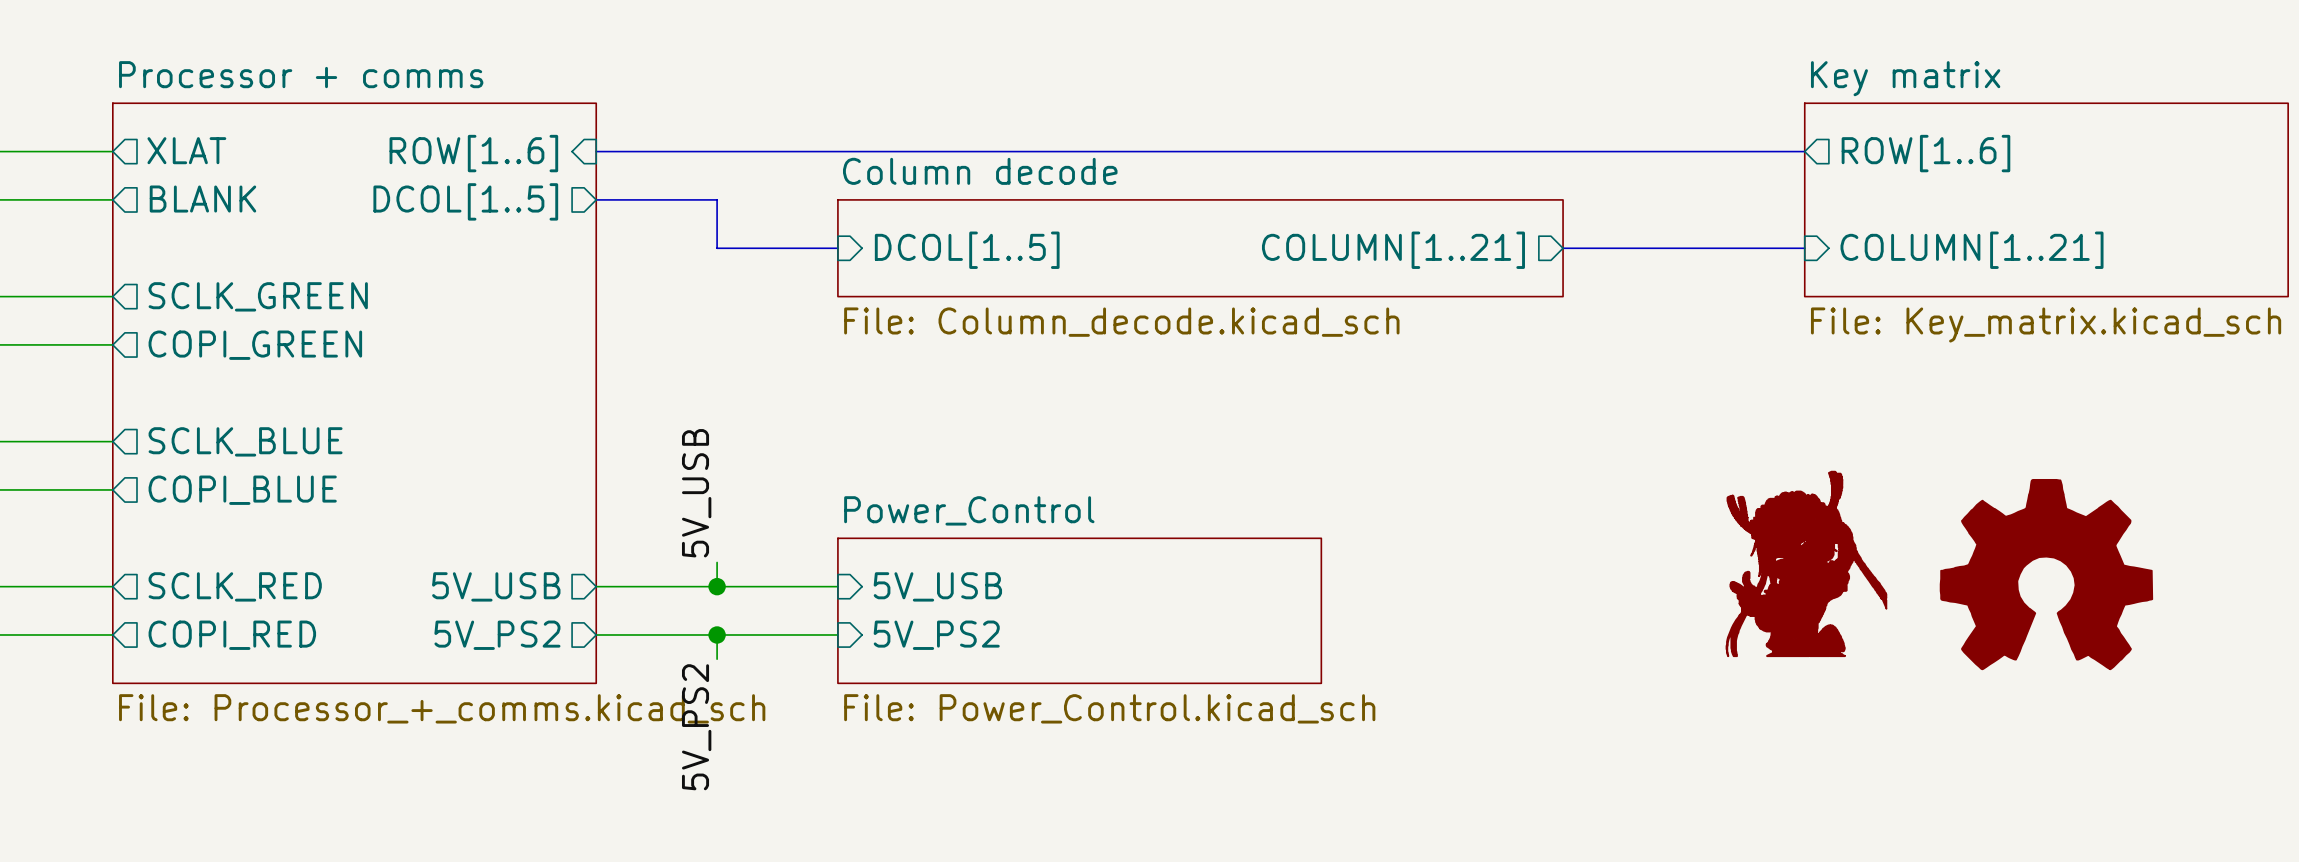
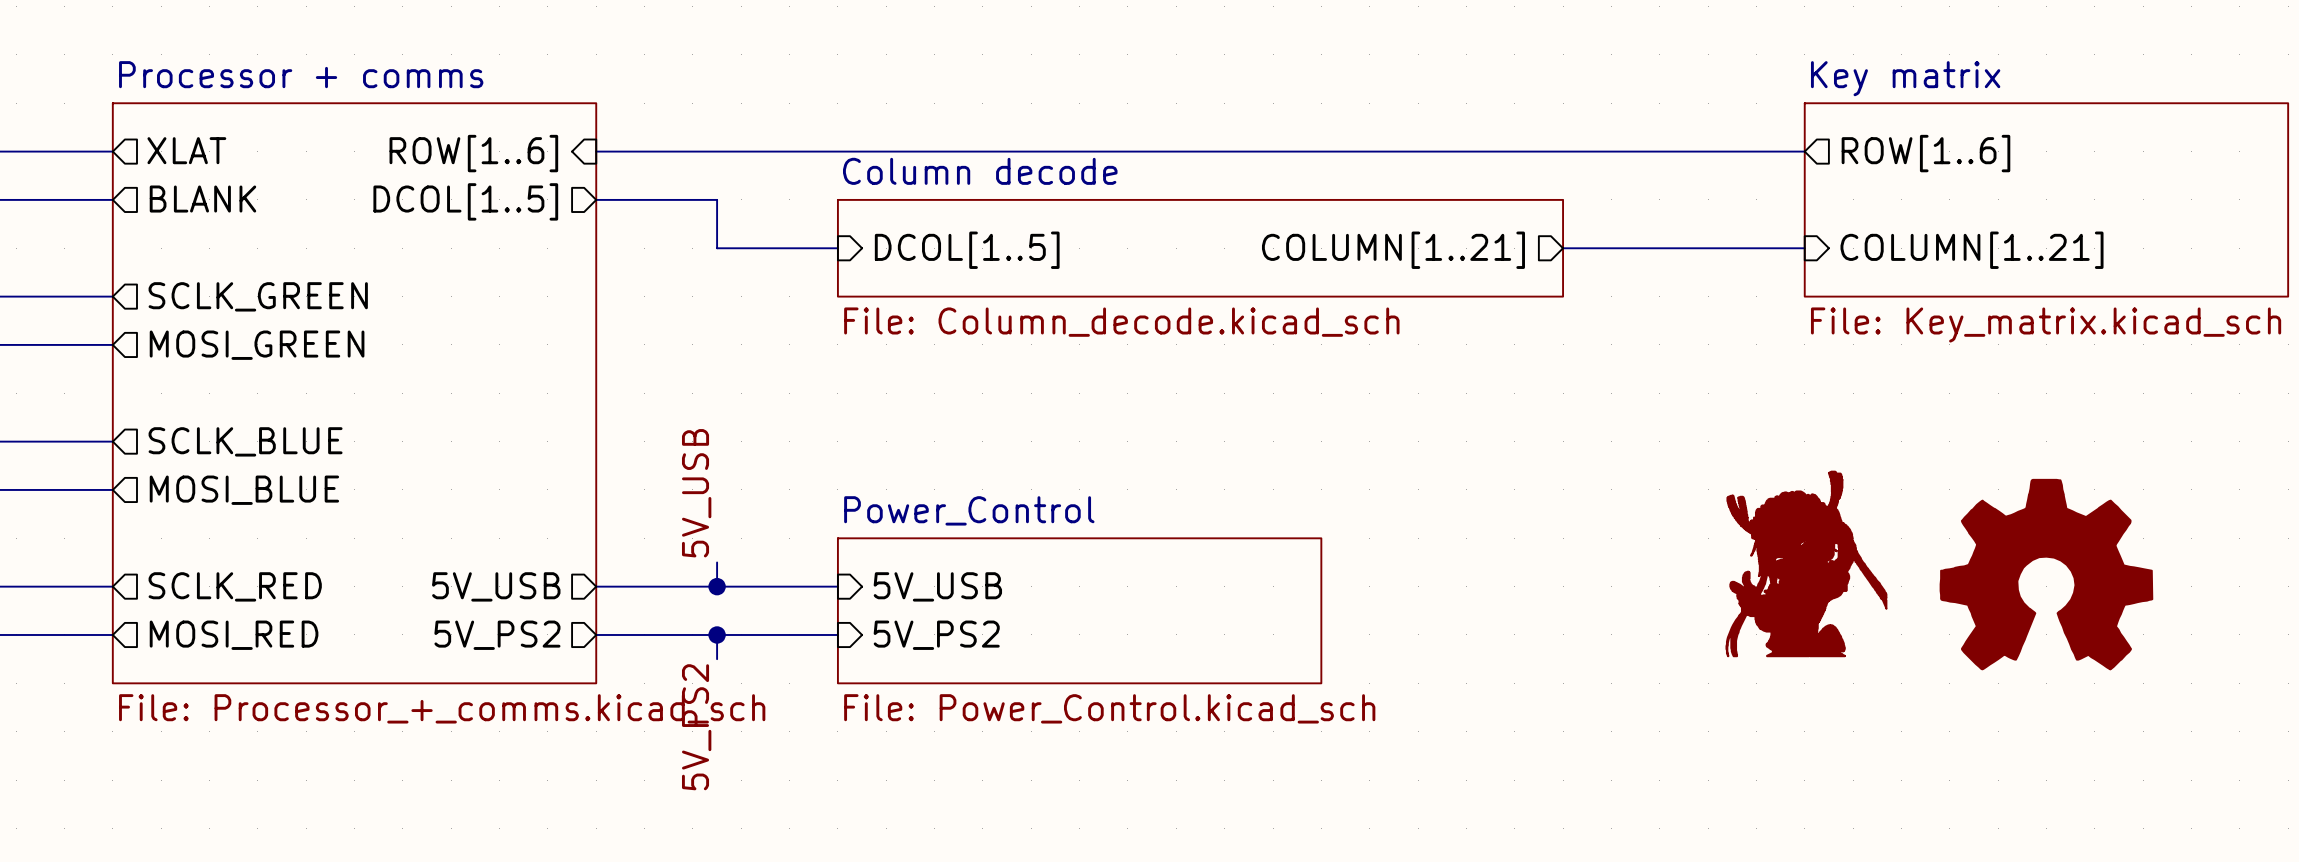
sheet pin: COPI_GREEN (255, 345) -> MOSI_GREEN (257, 345)
sheet pin: COPI_BLUE (242, 490) -> MOSI_BLUE (244, 490)
sheet pin: COPI_RED (232, 635) -> MOSI_RED (234, 635)

